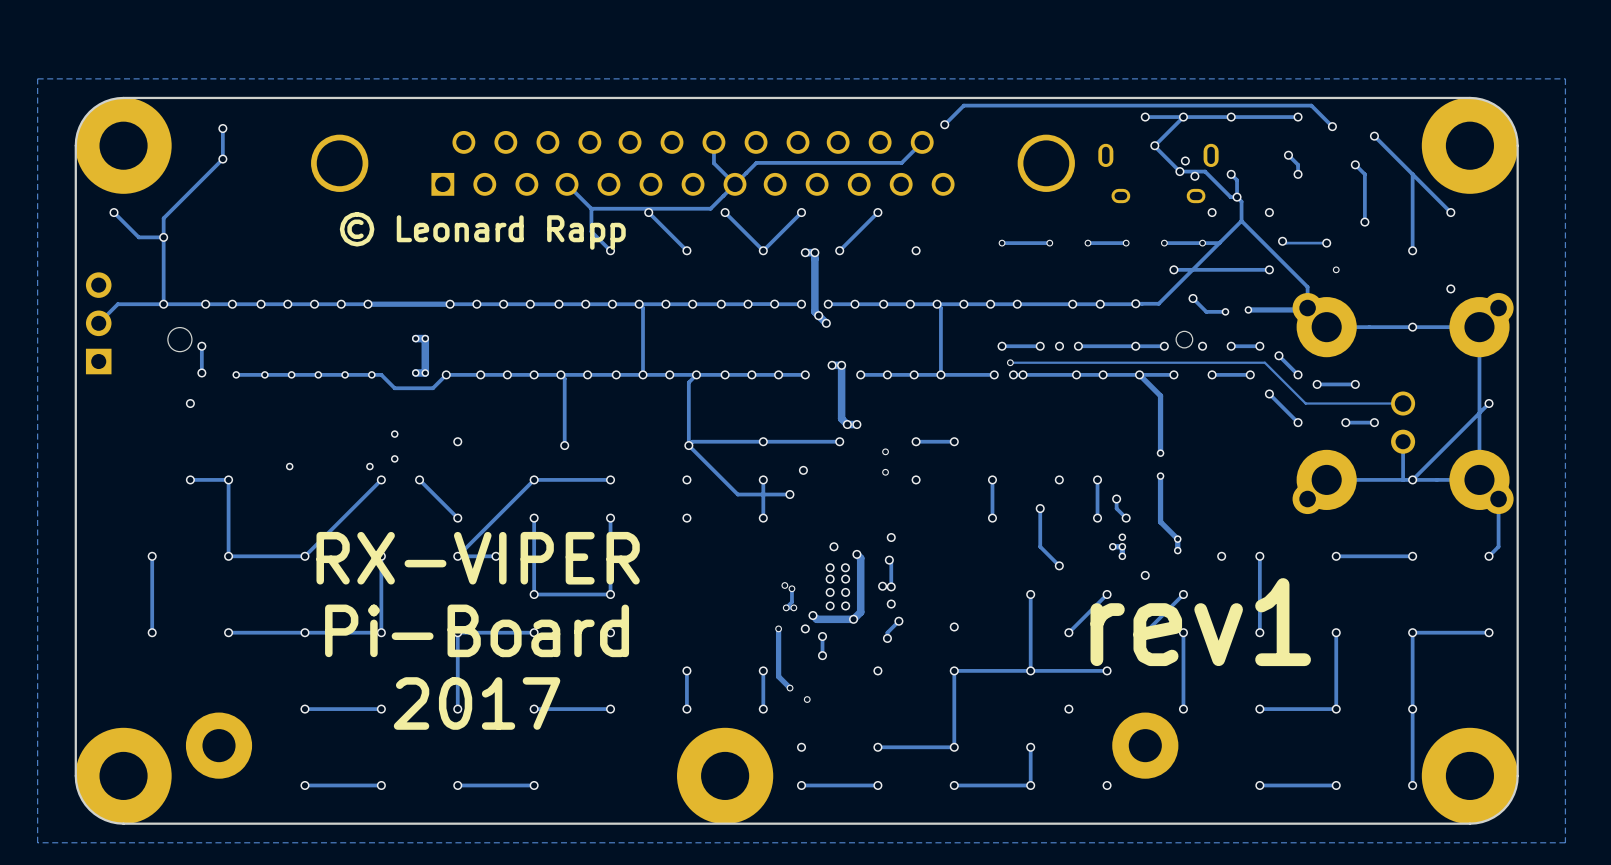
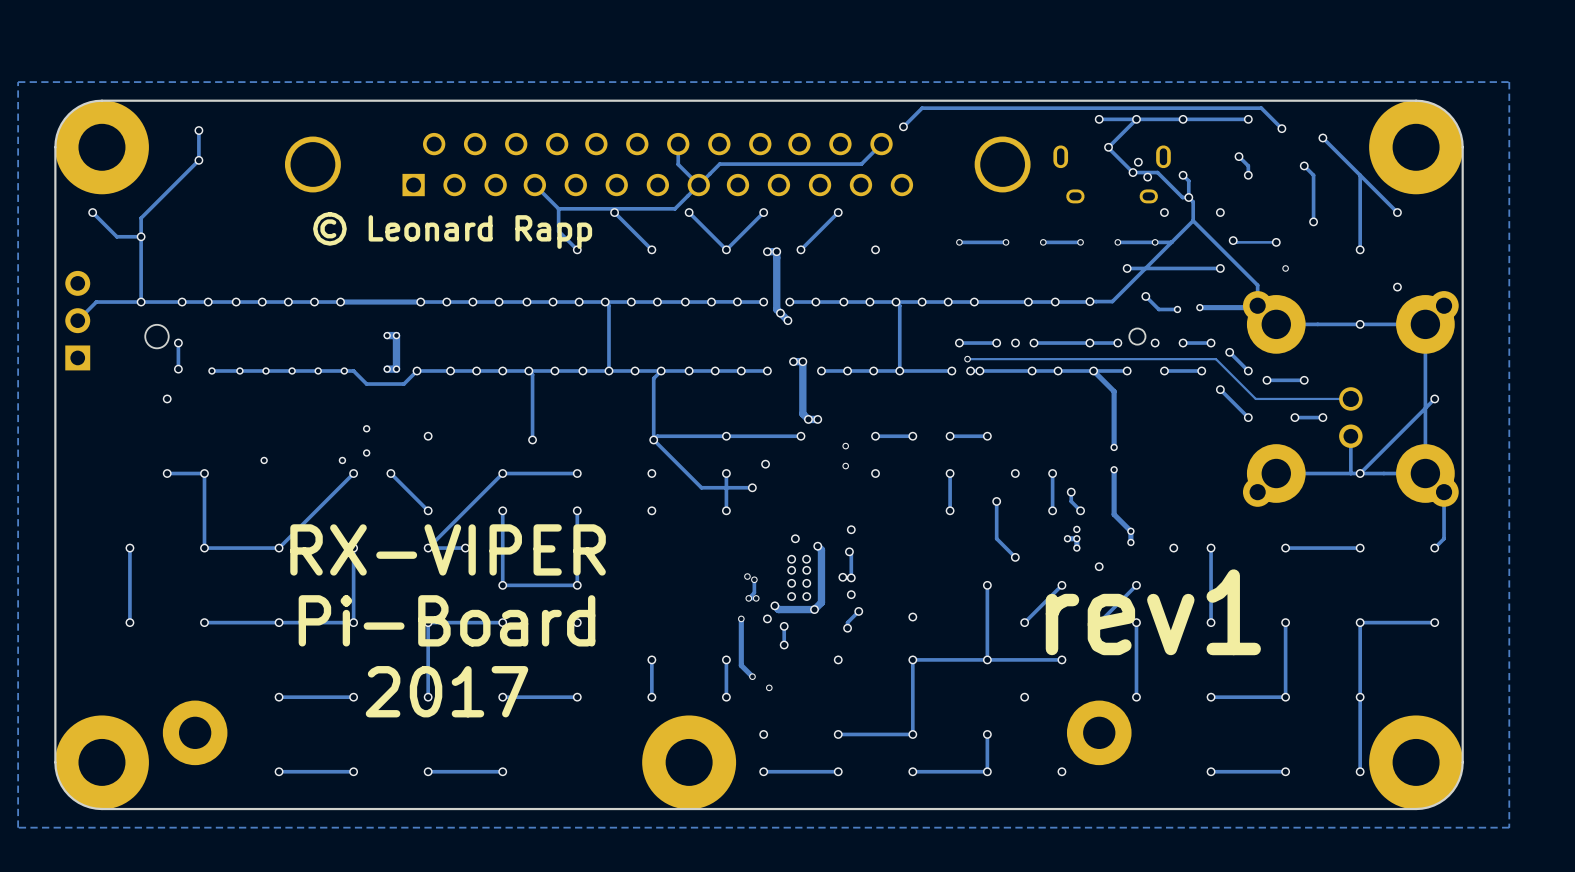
via: none -> (950, 436)
track: none -> (987, 436) (950, 436)
via: none -> (987, 436)

